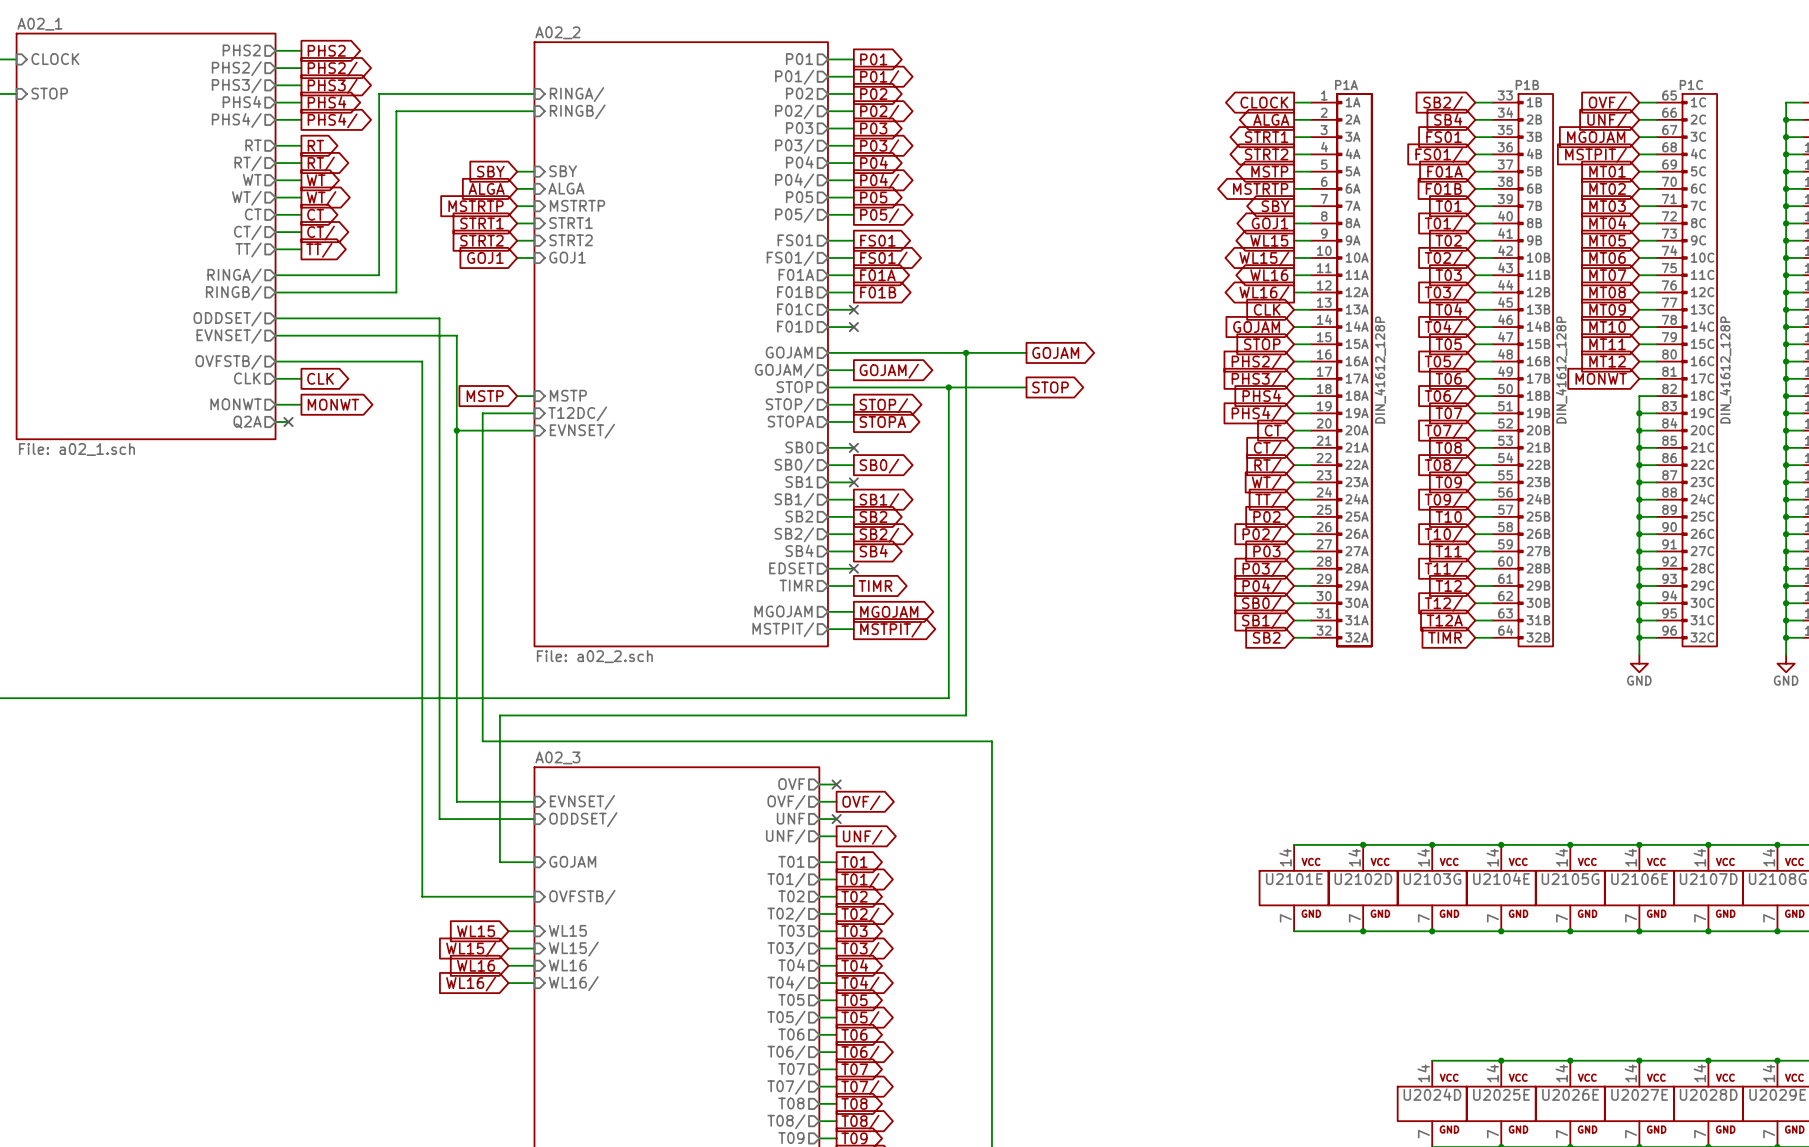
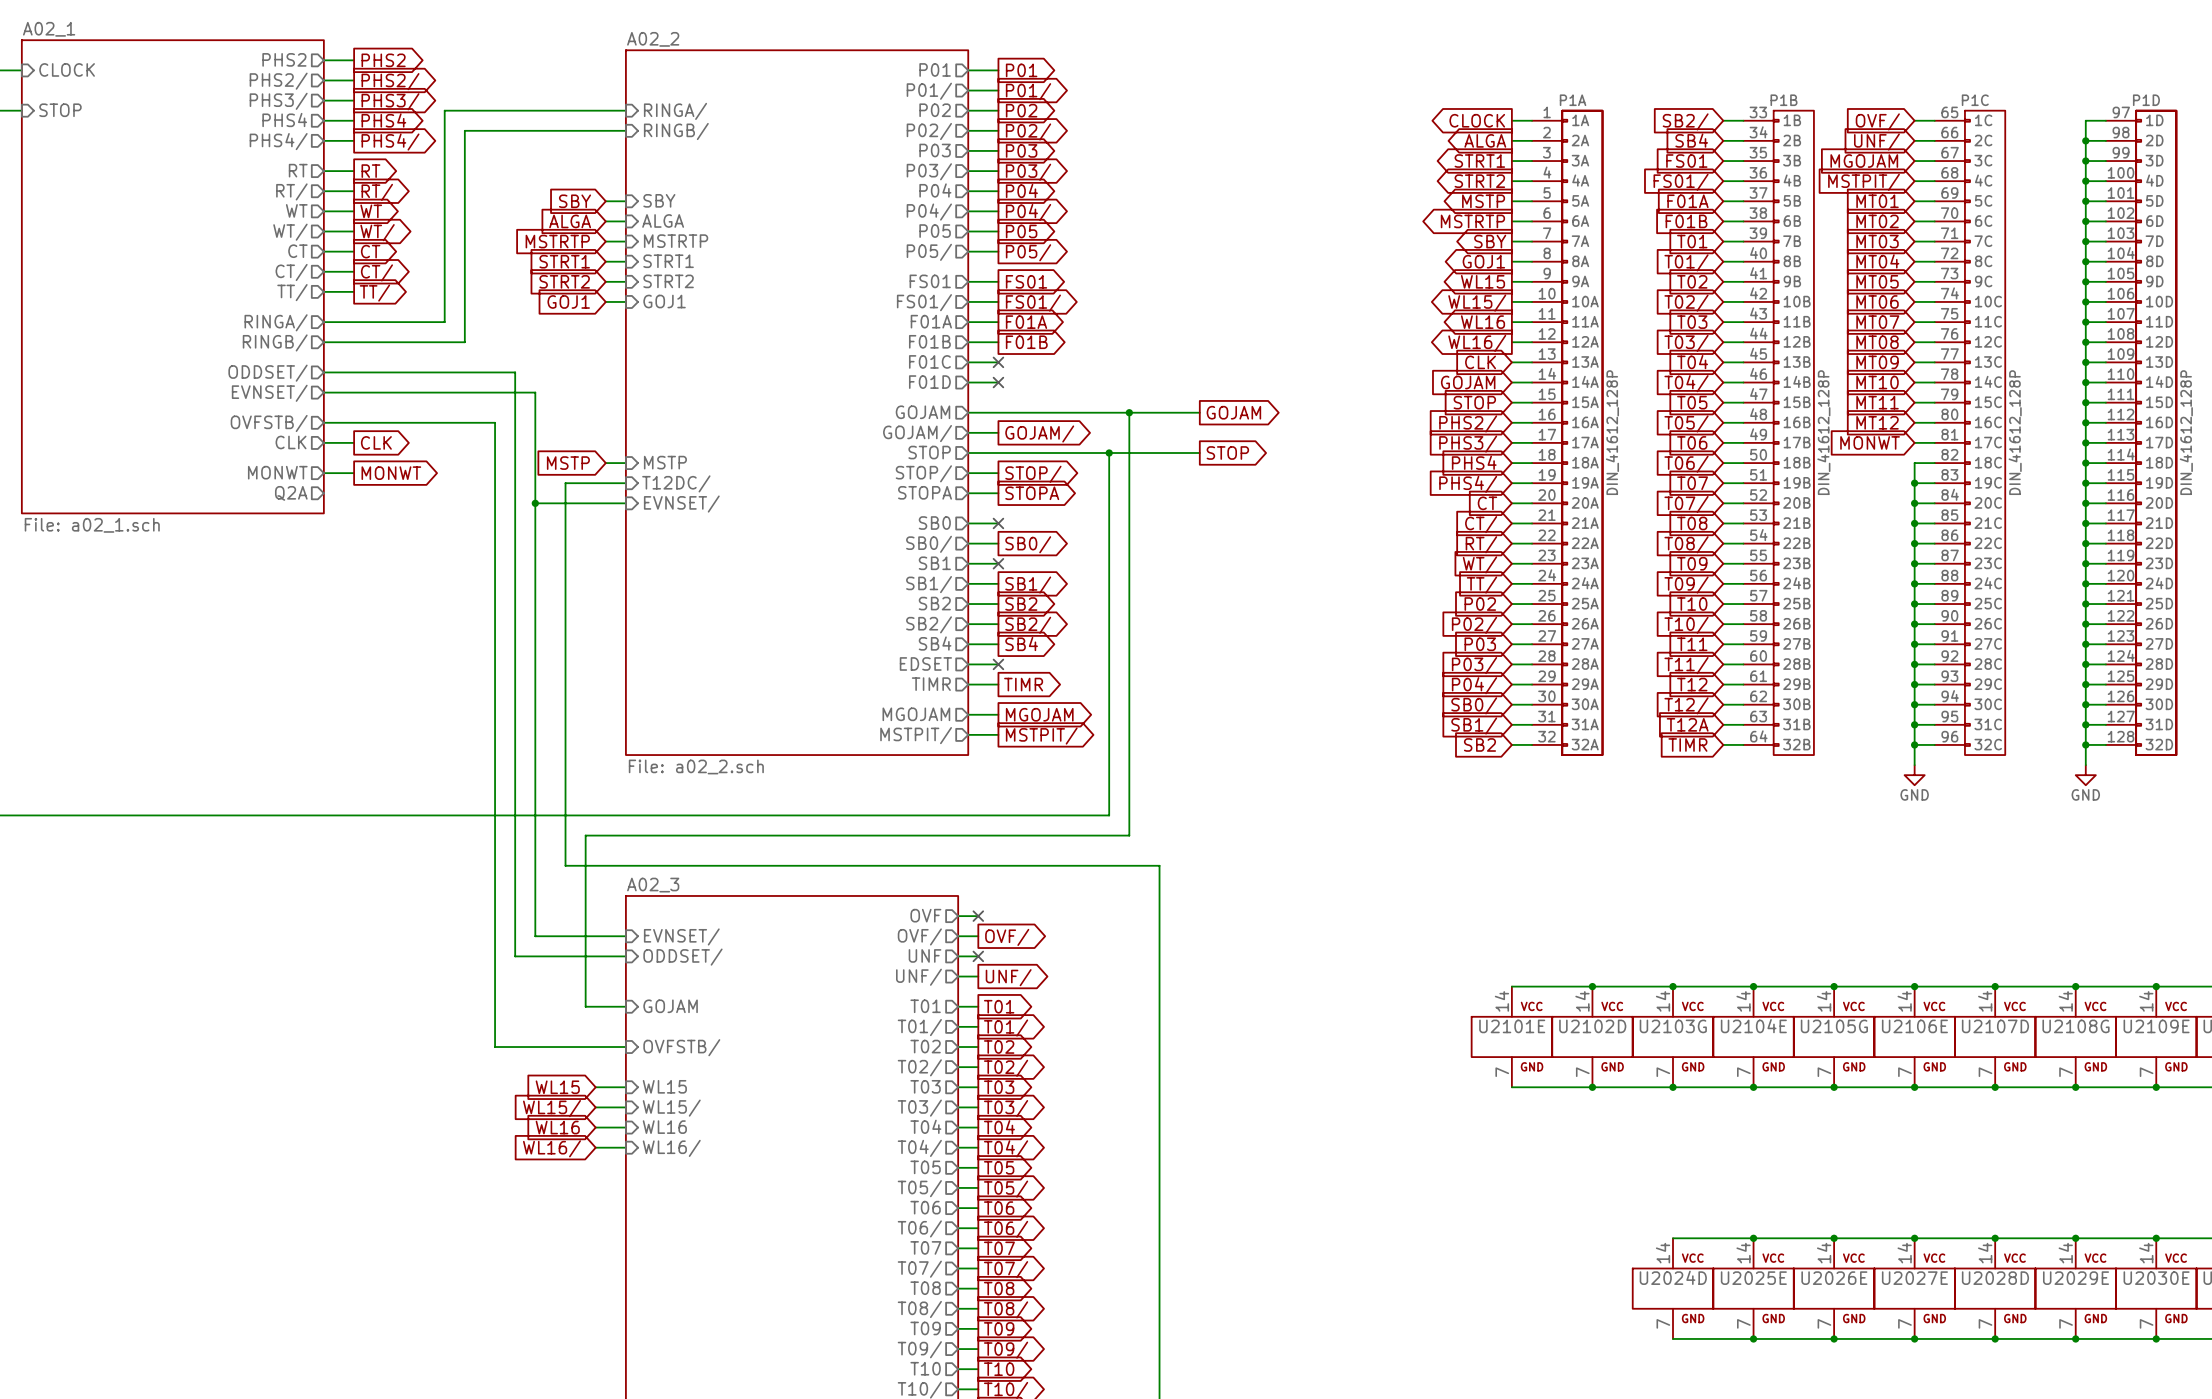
wire: (275, 421) (288, 421) -> none
no-connect mark: (288, 421) -> none

